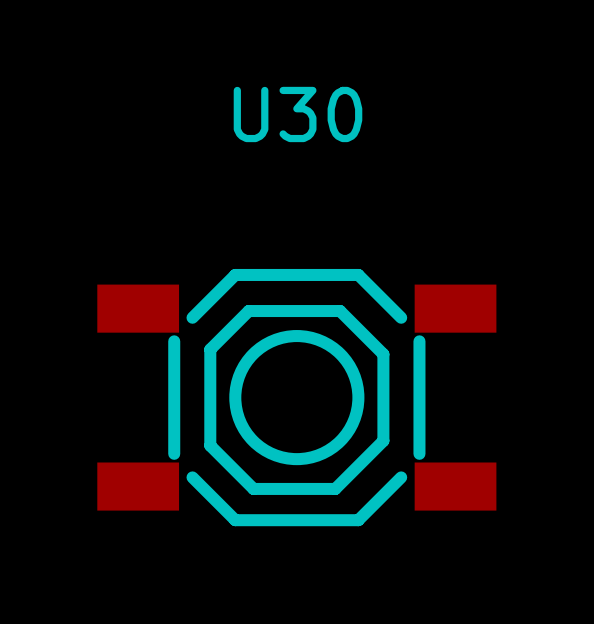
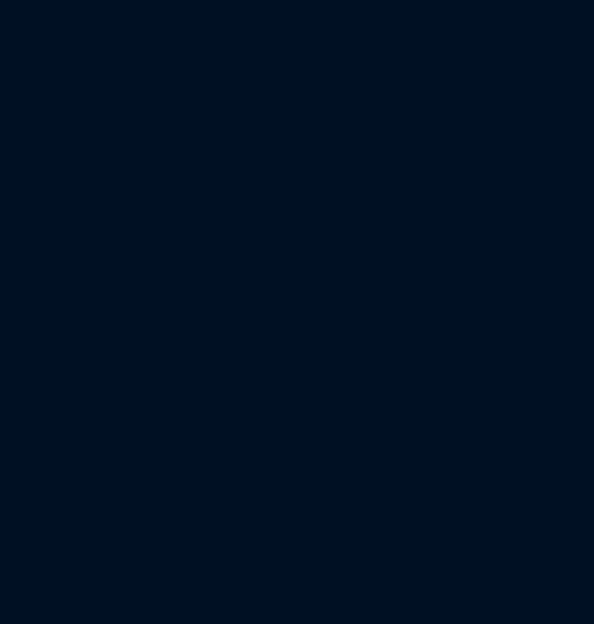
U30: (296, 397) -> none

